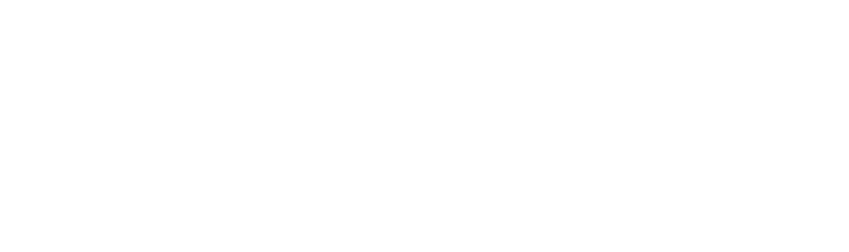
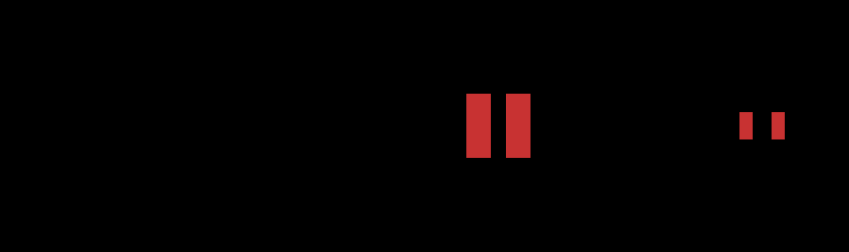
part: none -> (498, 125)
part: none -> (762, 125)

